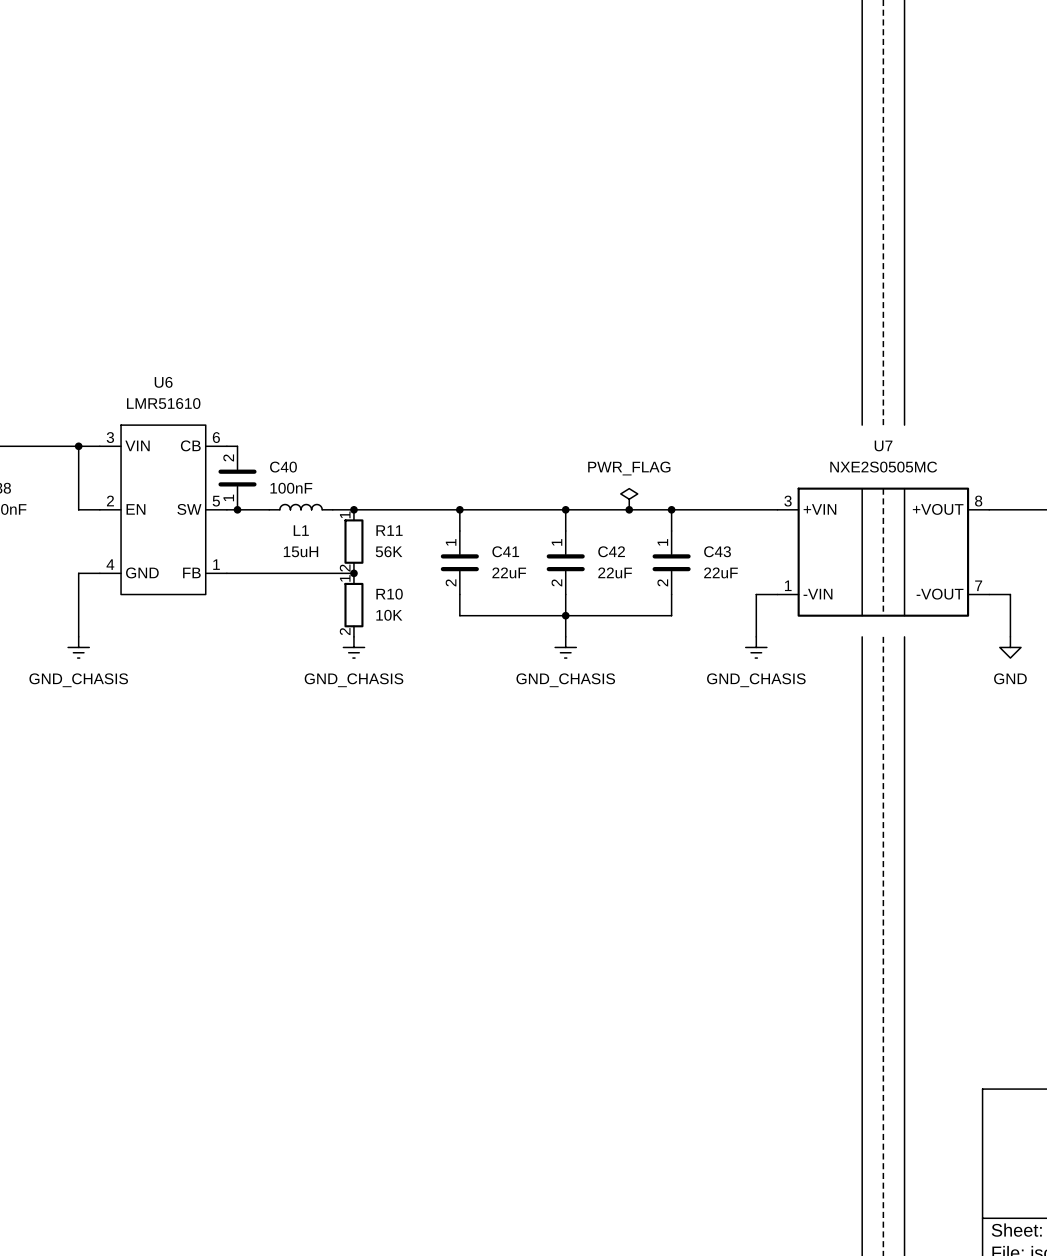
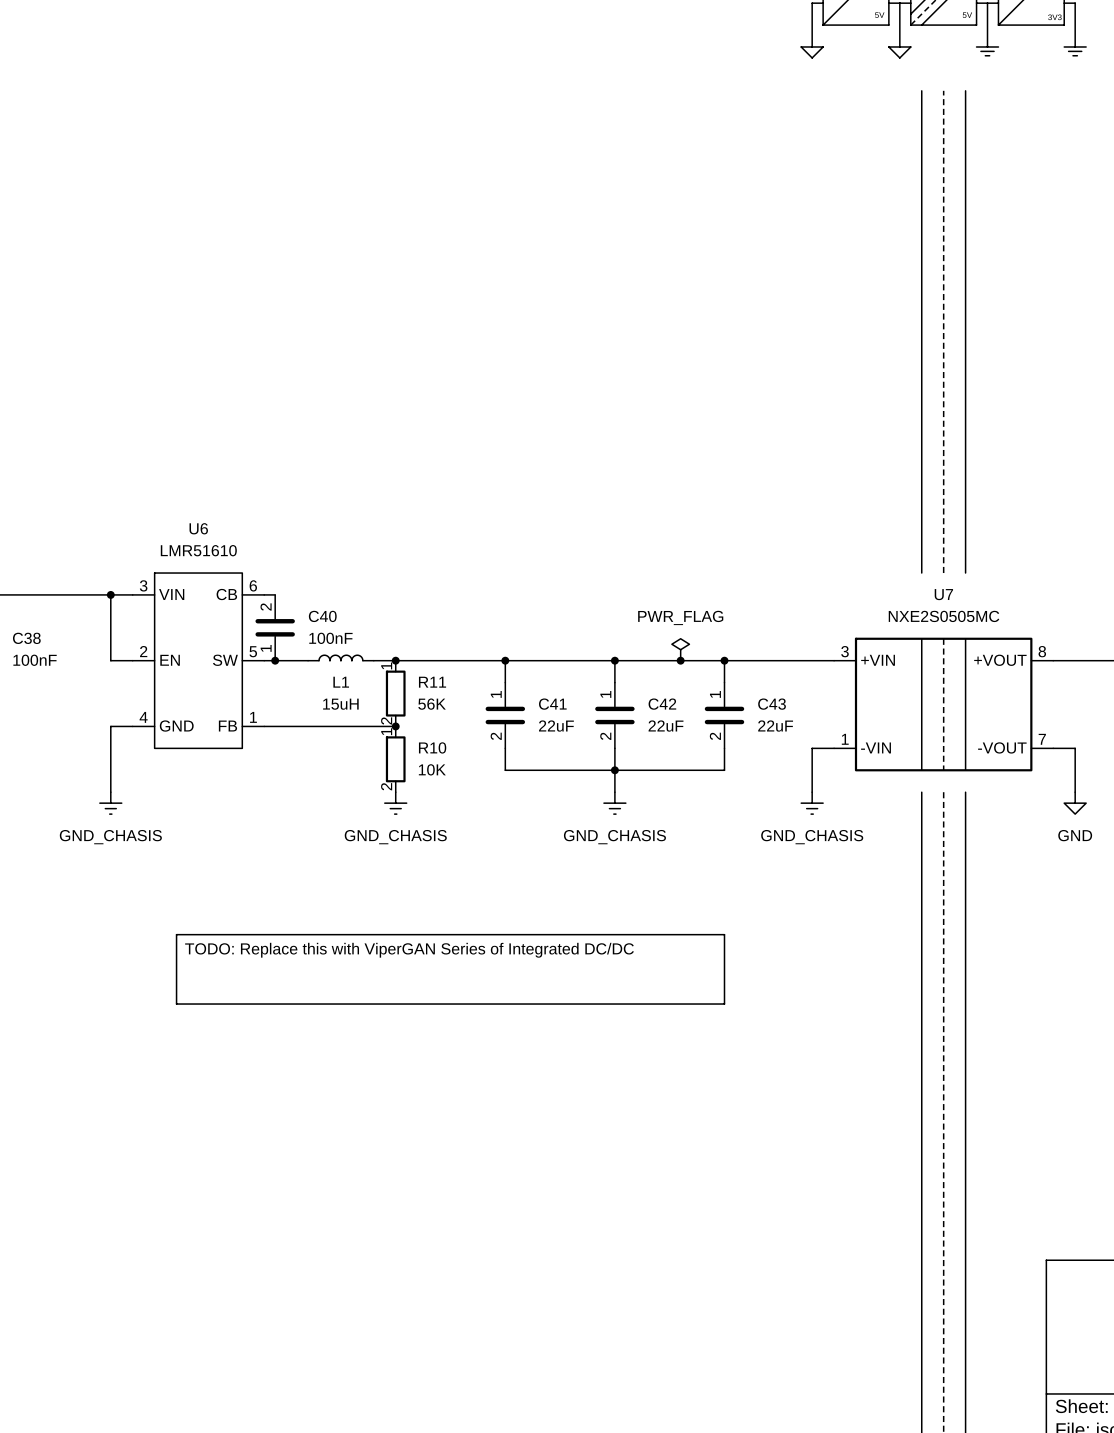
line: none -> (176, 934) (724, 934) (724, 1004) (176, 1004) (176, 934)
text: none -> TODO: Replace this with ViperGAN Series of Integrated DC/DC (409, 950)

